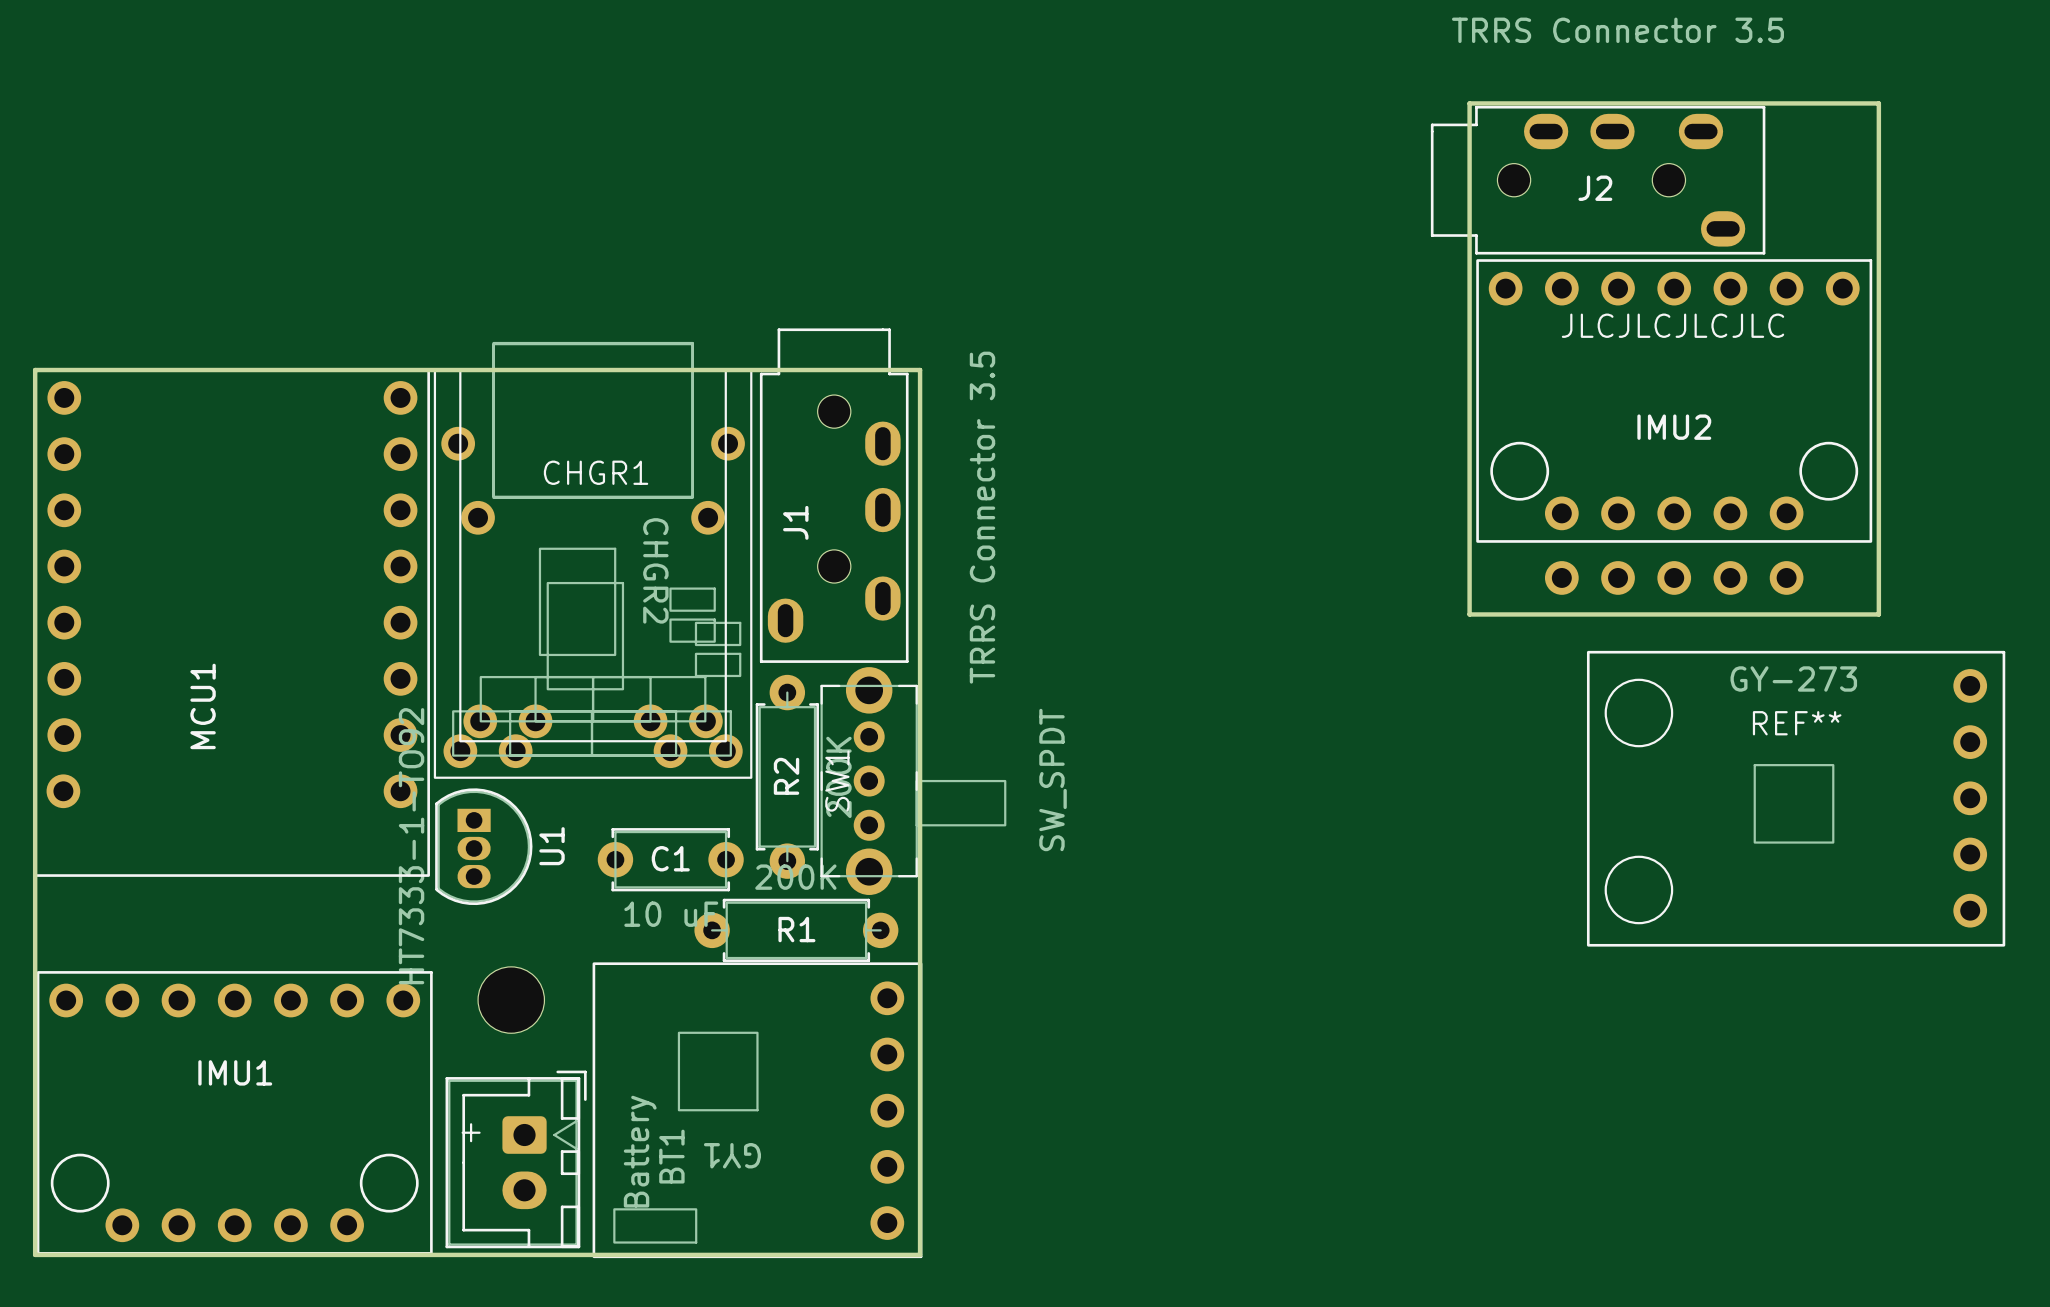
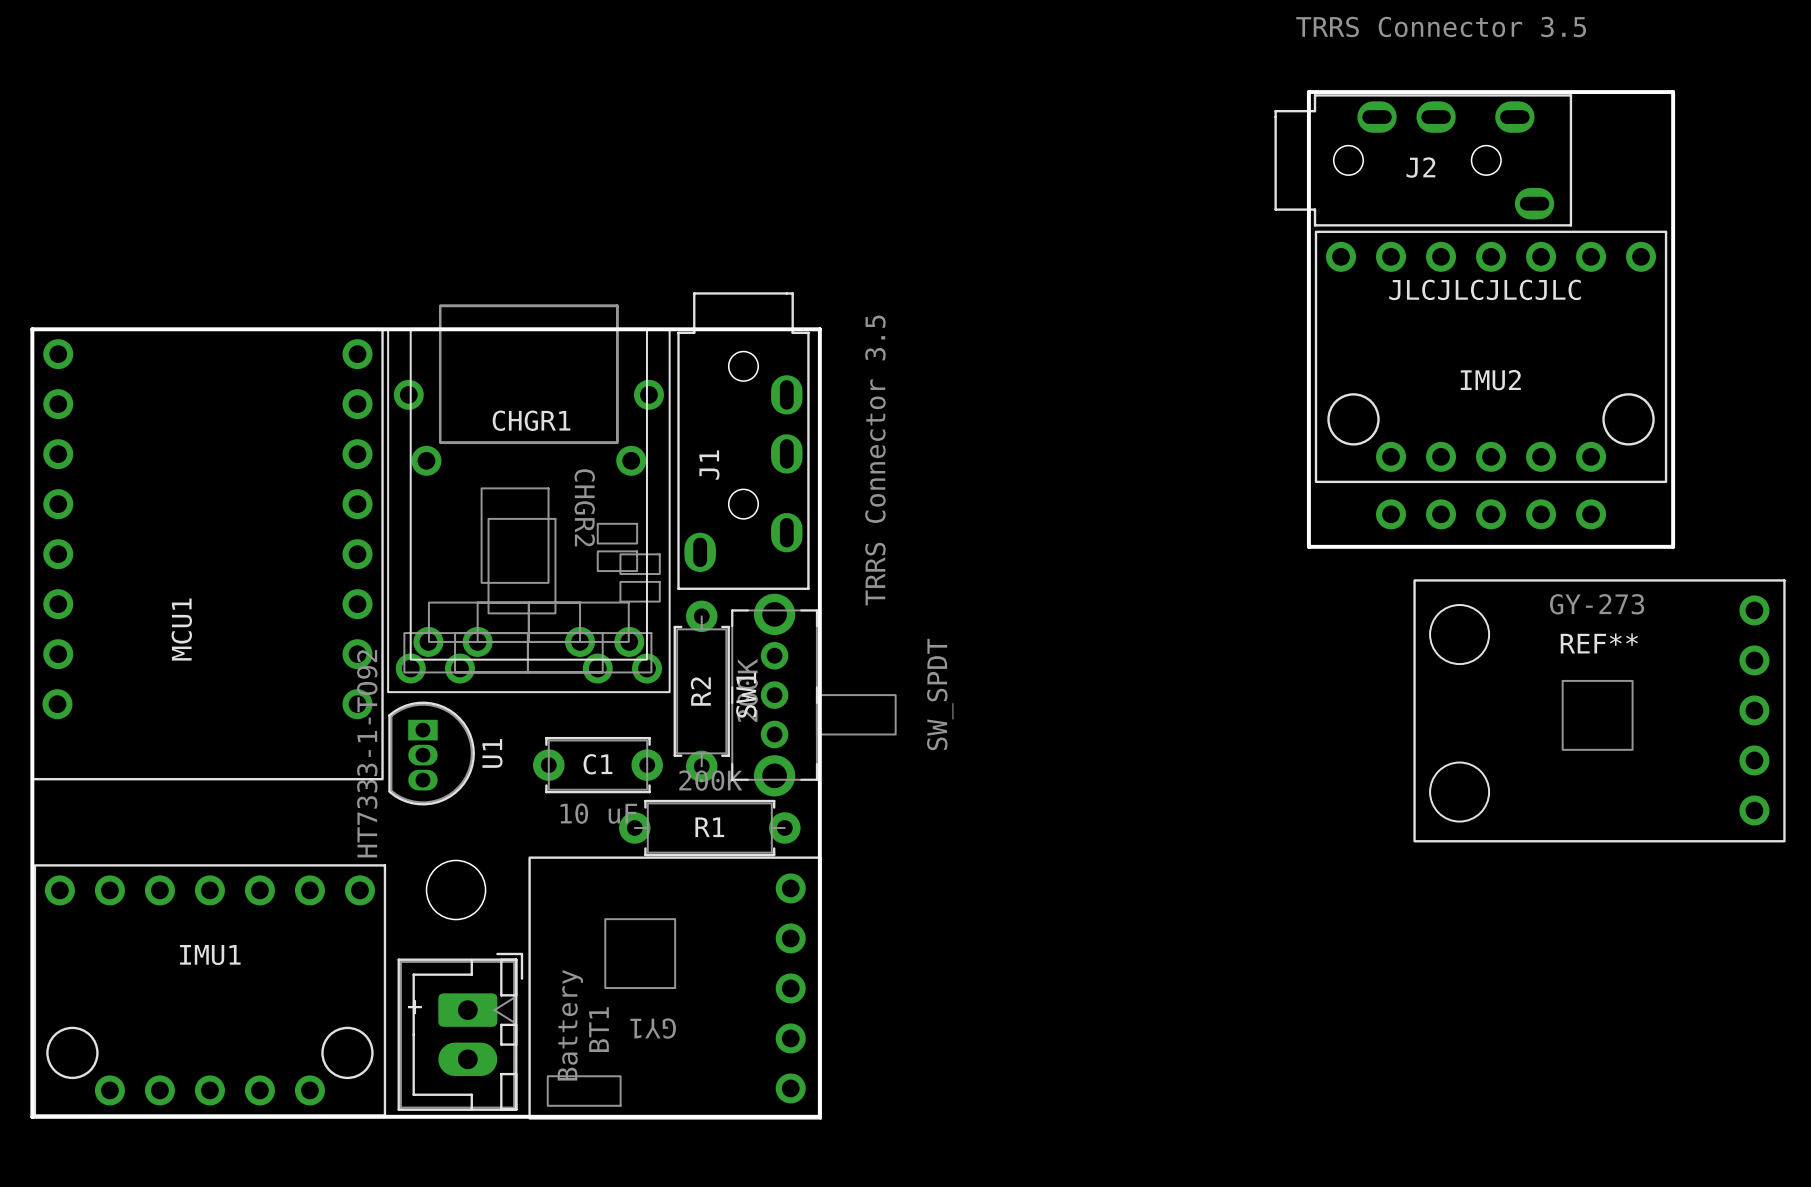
BT1 footprint: [445, 1070, 587, 1249] -> [397, 952, 524, 1111]

